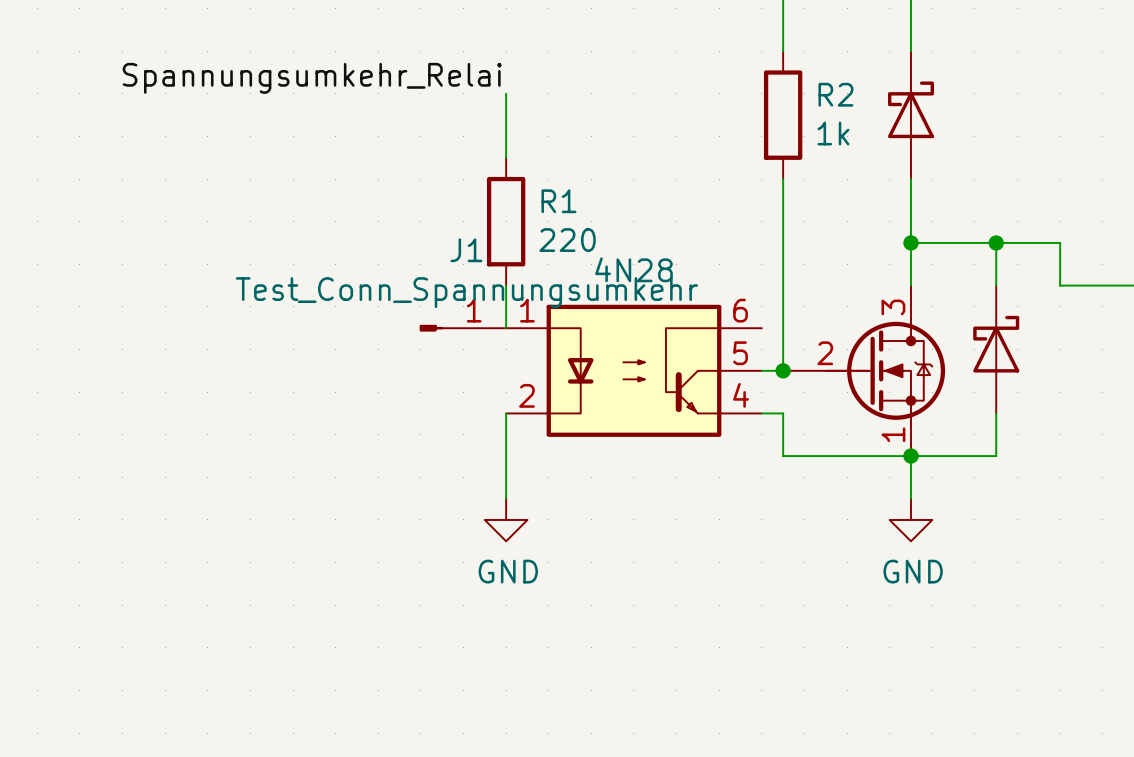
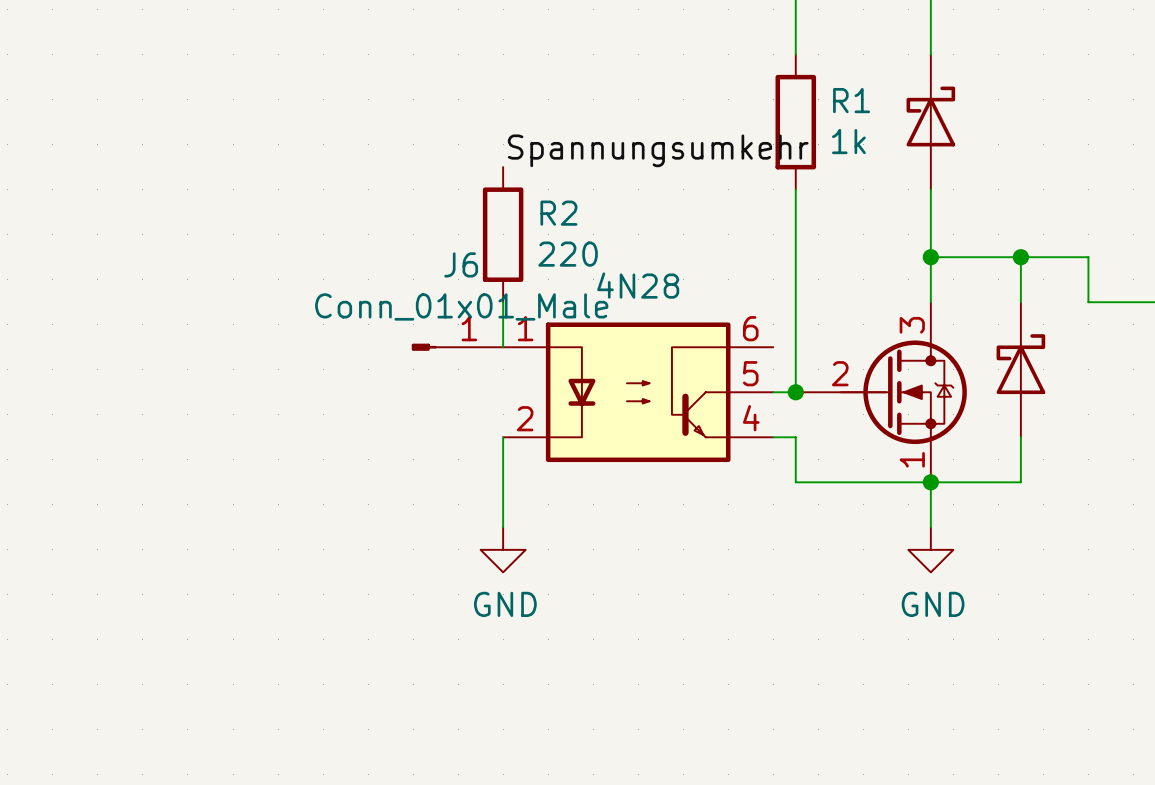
label: Spannungsumkehr_Relai (312, 78) -> none
wire: (506, 93) (506, 157) -> none
R2 name: R2 (835, 94) -> R1 (851, 100)
label: none -> Spannungsumkehr (658, 150)
R1 name: R1 (558, 201) -> R2 (558, 213)
J1 name: J1 (466, 250) -> J6 (461, 264)
J1 value: Test_Conn_Spannungsumkehr (466, 292) -> Conn_01x01_Male (461, 306)

